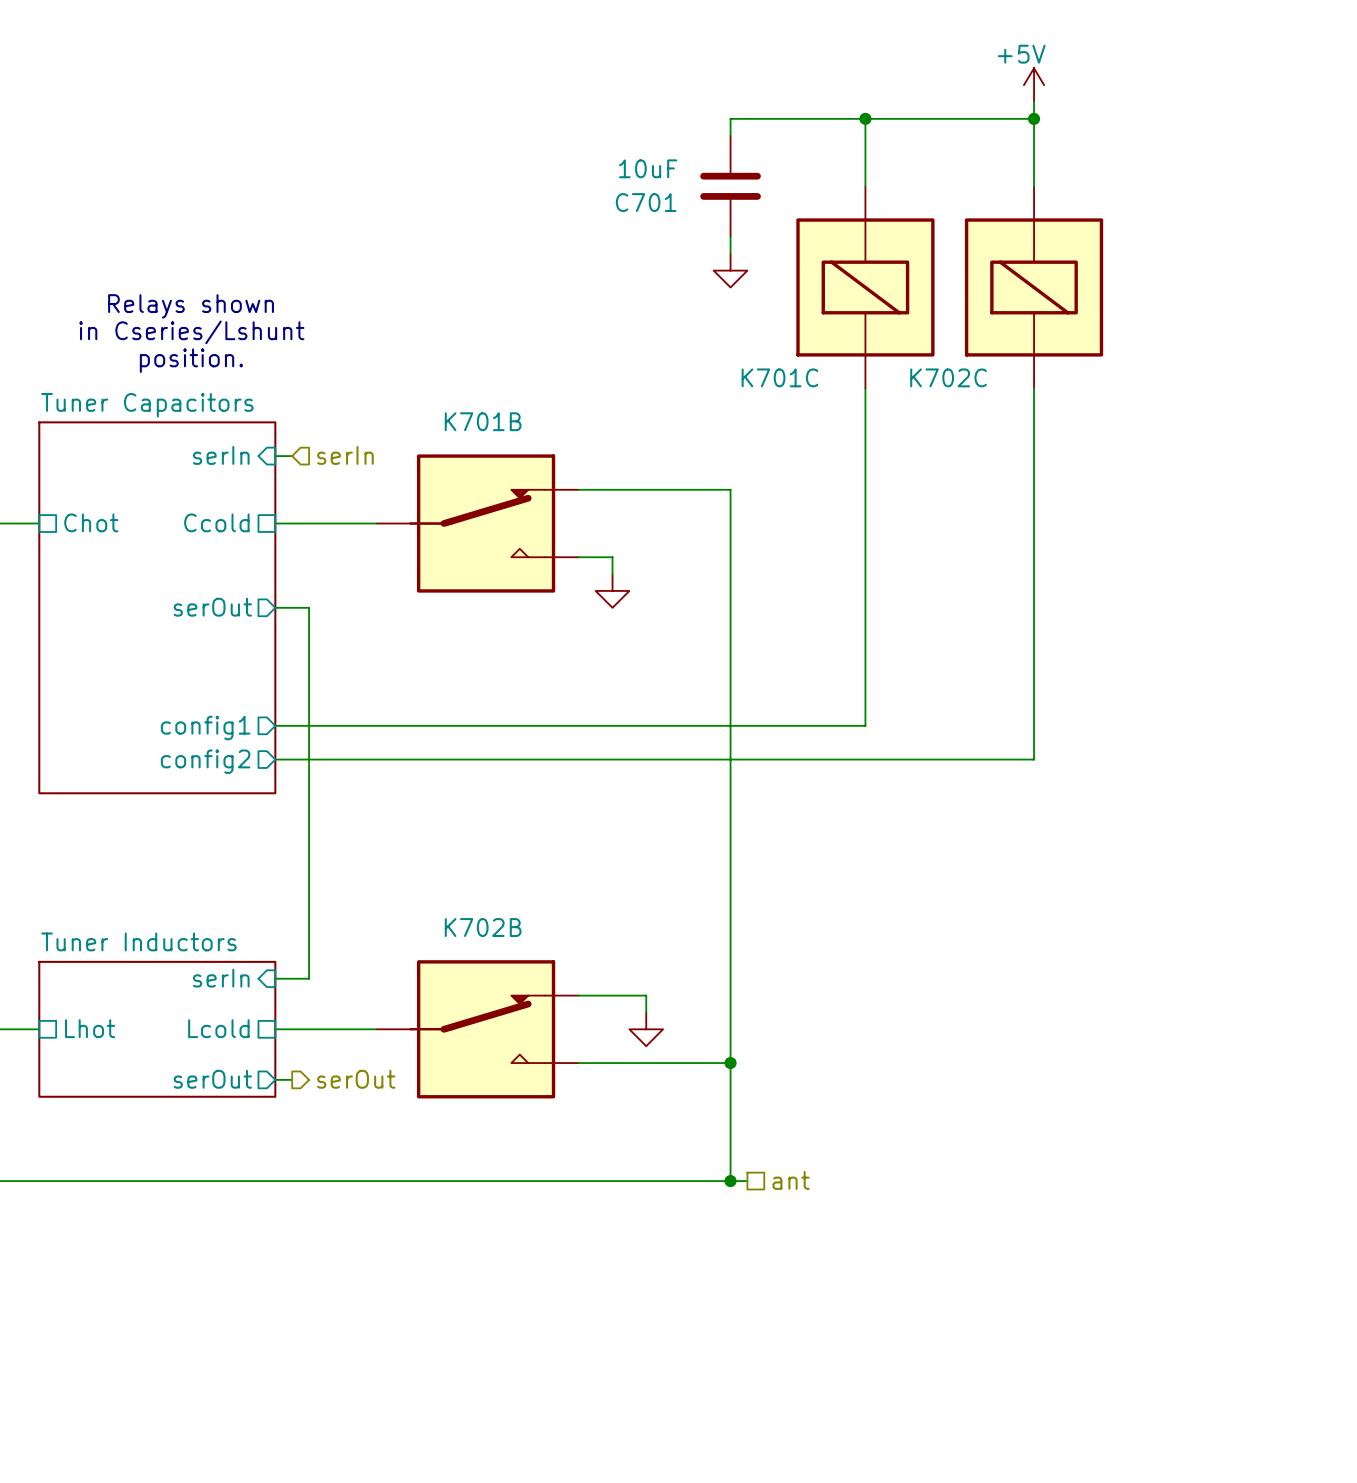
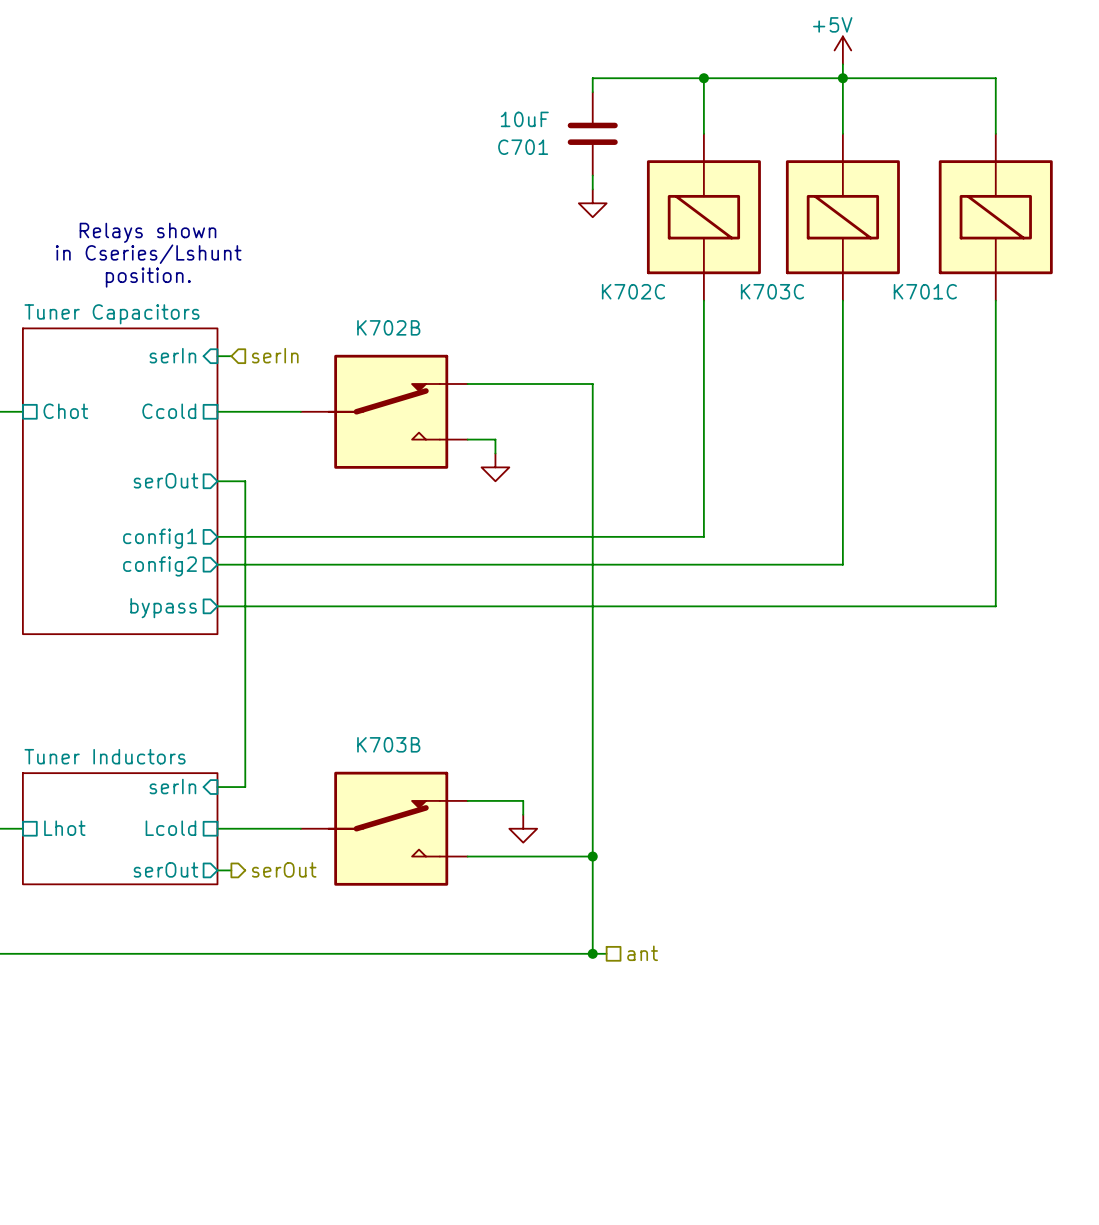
wire: none -> (842, 78) (995, 78) (995, 133)
K701C: none -> (995, 217)
K701C name: K701C (779, 377) -> K702C (633, 291)
K702C name: K702C (948, 377) -> K703C (772, 291)
K701B name: K701B (483, 421) -> K702B (388, 327)
wire: (865, 675) (865, 725) (275, 725) -> (703, 536) (217, 536)
wire: none -> (217, 564) (842, 564)
wire: (1034, 708) (1034, 759) -> (995, 300) (995, 606) (842, 606)
sheet pin: none -> config2 (160, 566)
sheet pin position: config1 (205, 728) -> config1 (160, 538)
sheet pin: config2 (205, 761) -> bypass (163, 608)
K702B name: K702B (483, 927) -> K703B (388, 744)

